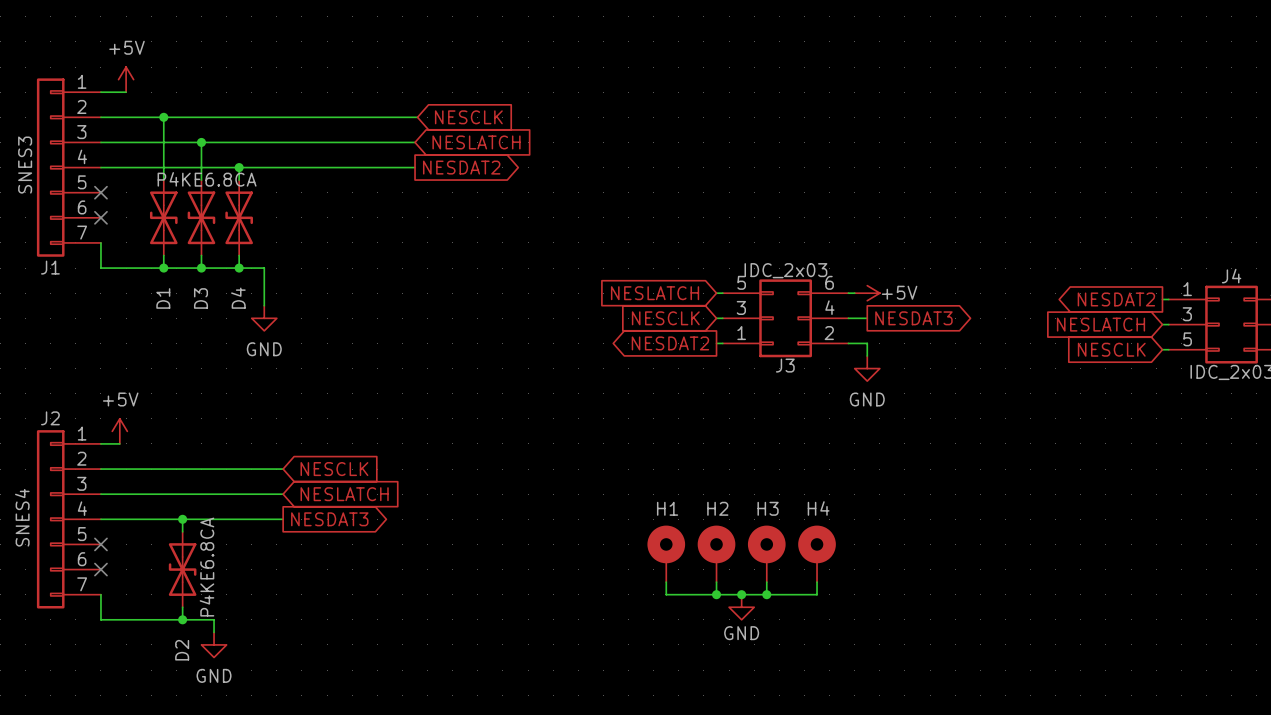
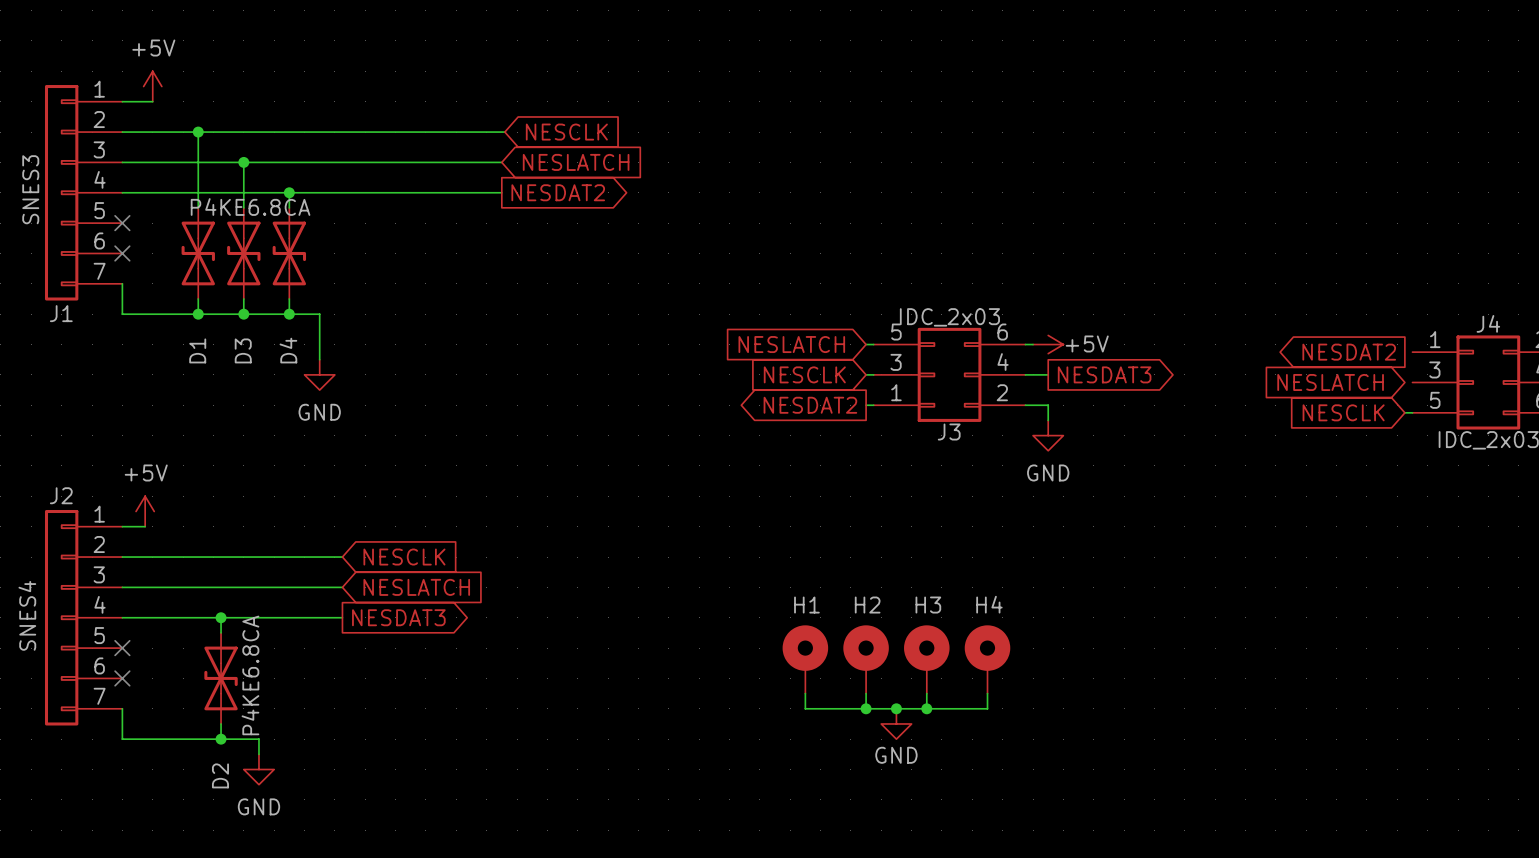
wire: (1162, 299) (1168, 299) -> none
wire: (1162, 324) (1168, 324) -> none

